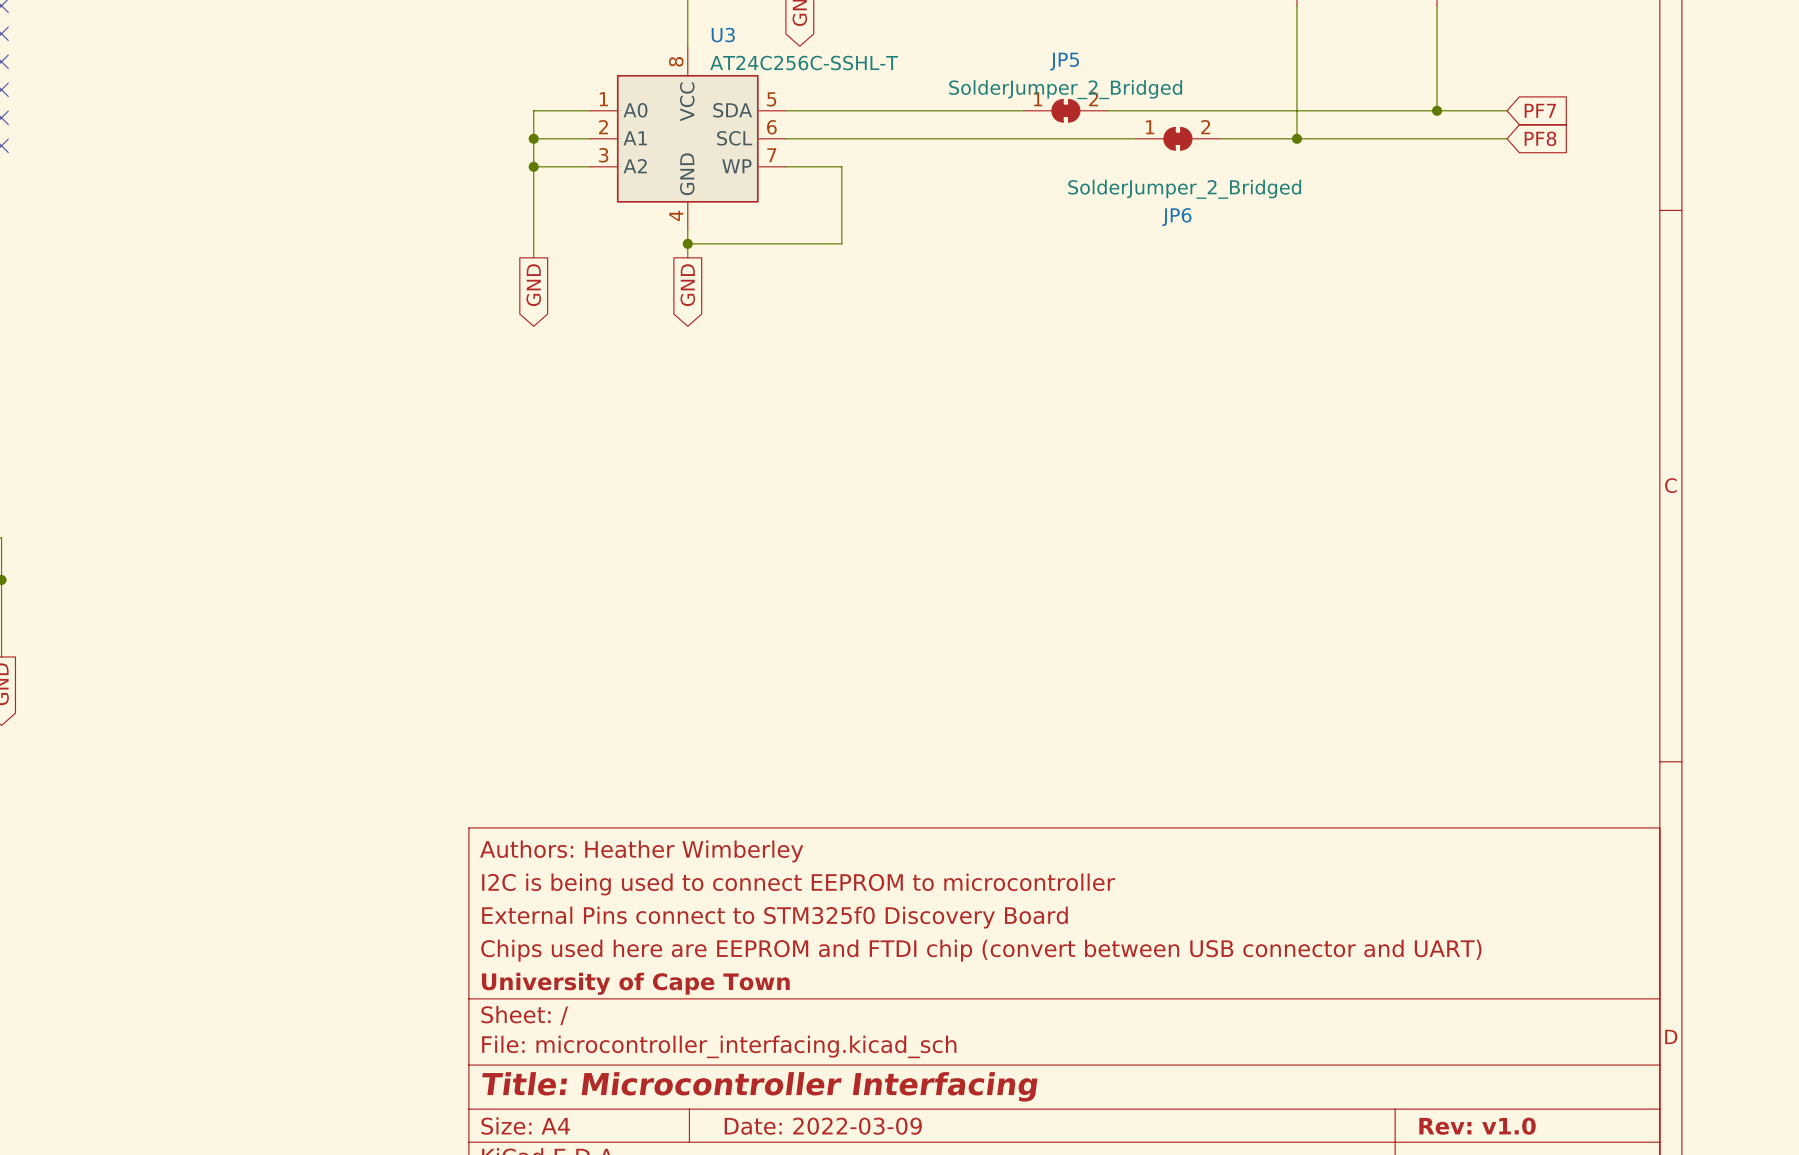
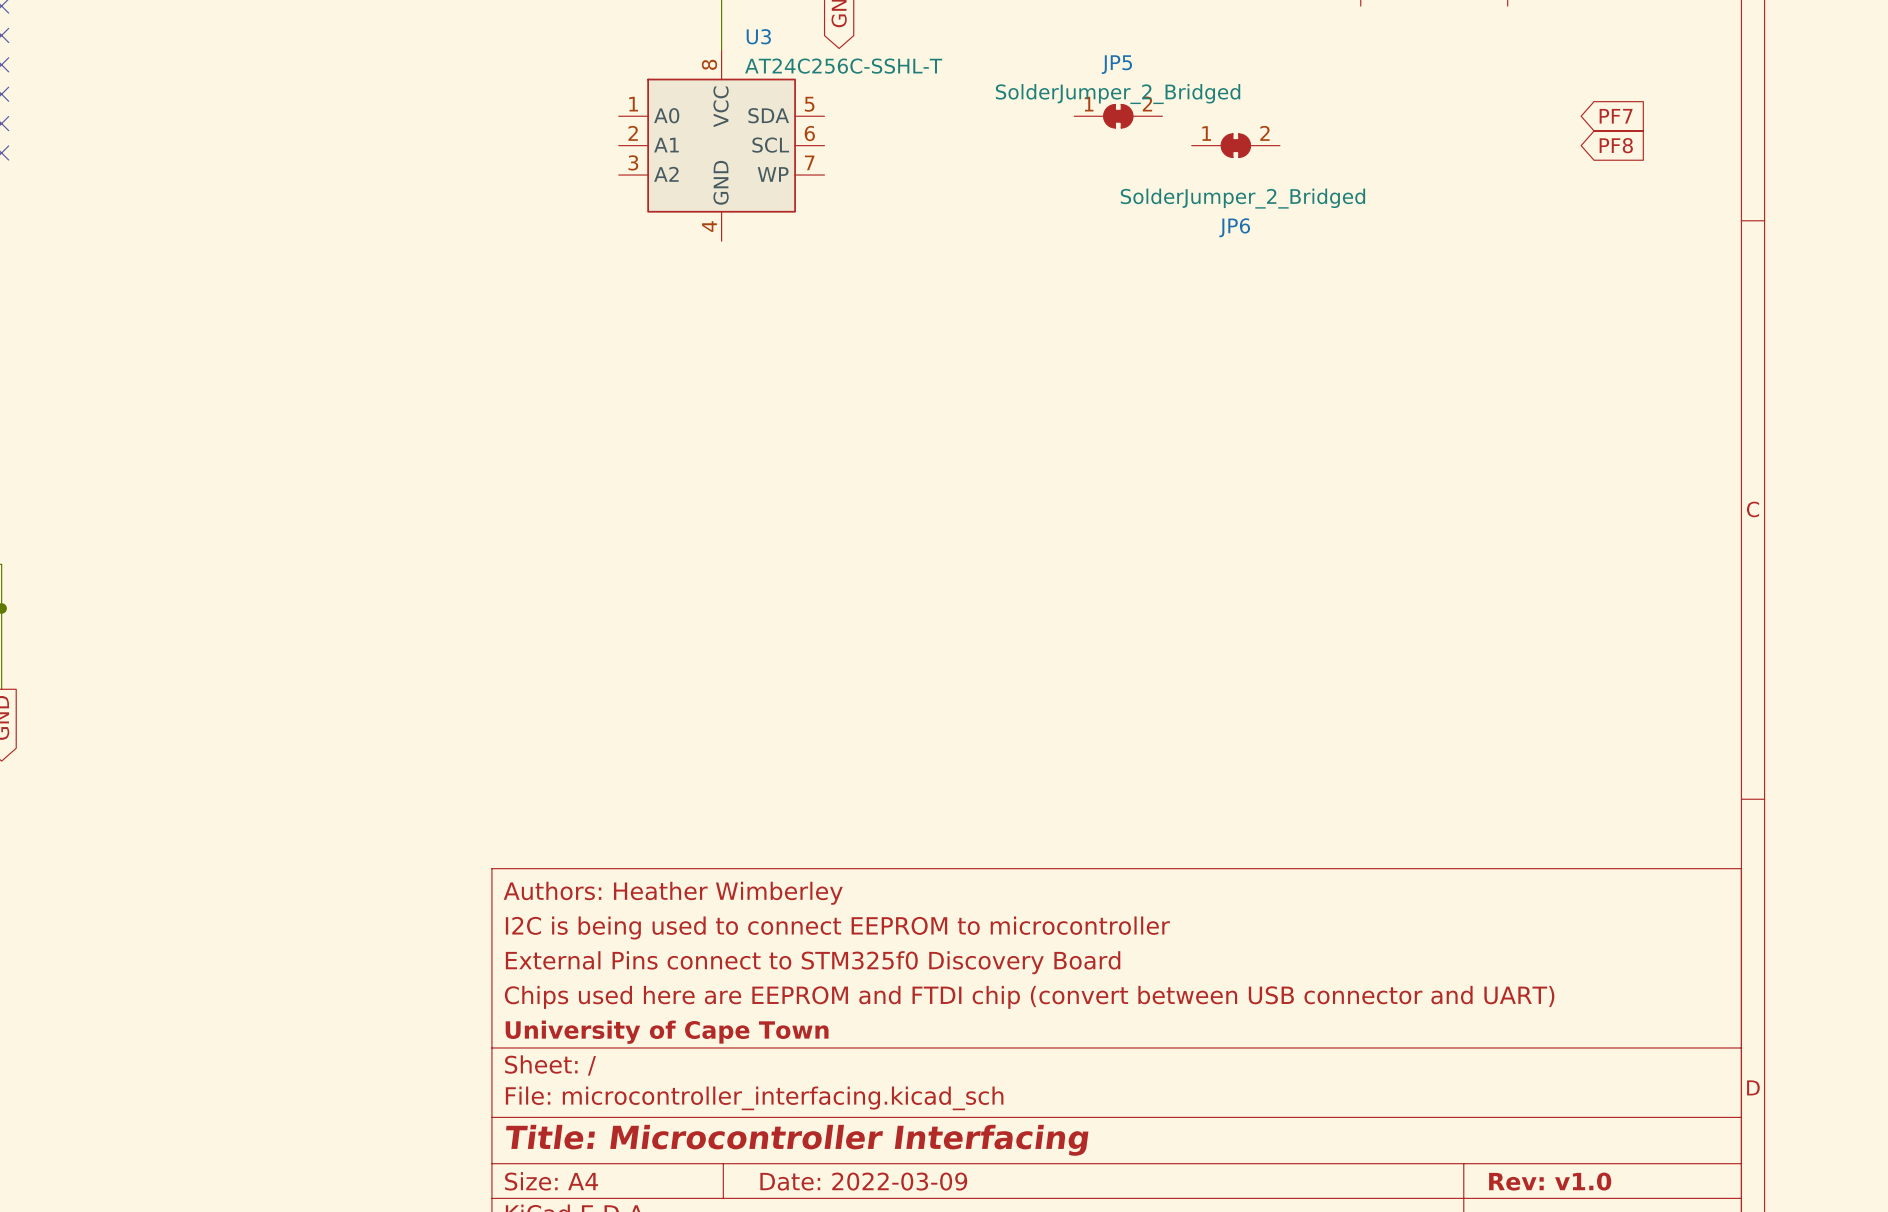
wire: (1296, 5) (1296, 138) -> none
wire: (1437, 5) (1437, 110) -> none
wire: (589, 110) (533, 110) (533, 257) -> none
wire: (785, 110) (1023, 110) -> none
wire: (1107, 110) (1507, 110) -> none
junction: (1437, 110) -> none
wire: (533, 138) (589, 138) -> none
junction: (533, 138) -> none
wire: (785, 138) (1135, 138) -> none
wire: (1219, 138) (1507, 138) -> none
junction: (1296, 138) -> none
wire: (533, 166) (589, 166) -> none
junction: (533, 166) -> none
wire: (785, 166) (841, 166) (841, 243) (687, 243) -> none
wire: (687, 229) (687, 257) -> none
junction: (687, 243) -> none
global label: GND (533, 285) -> none
global label: GND (687, 285) -> none

